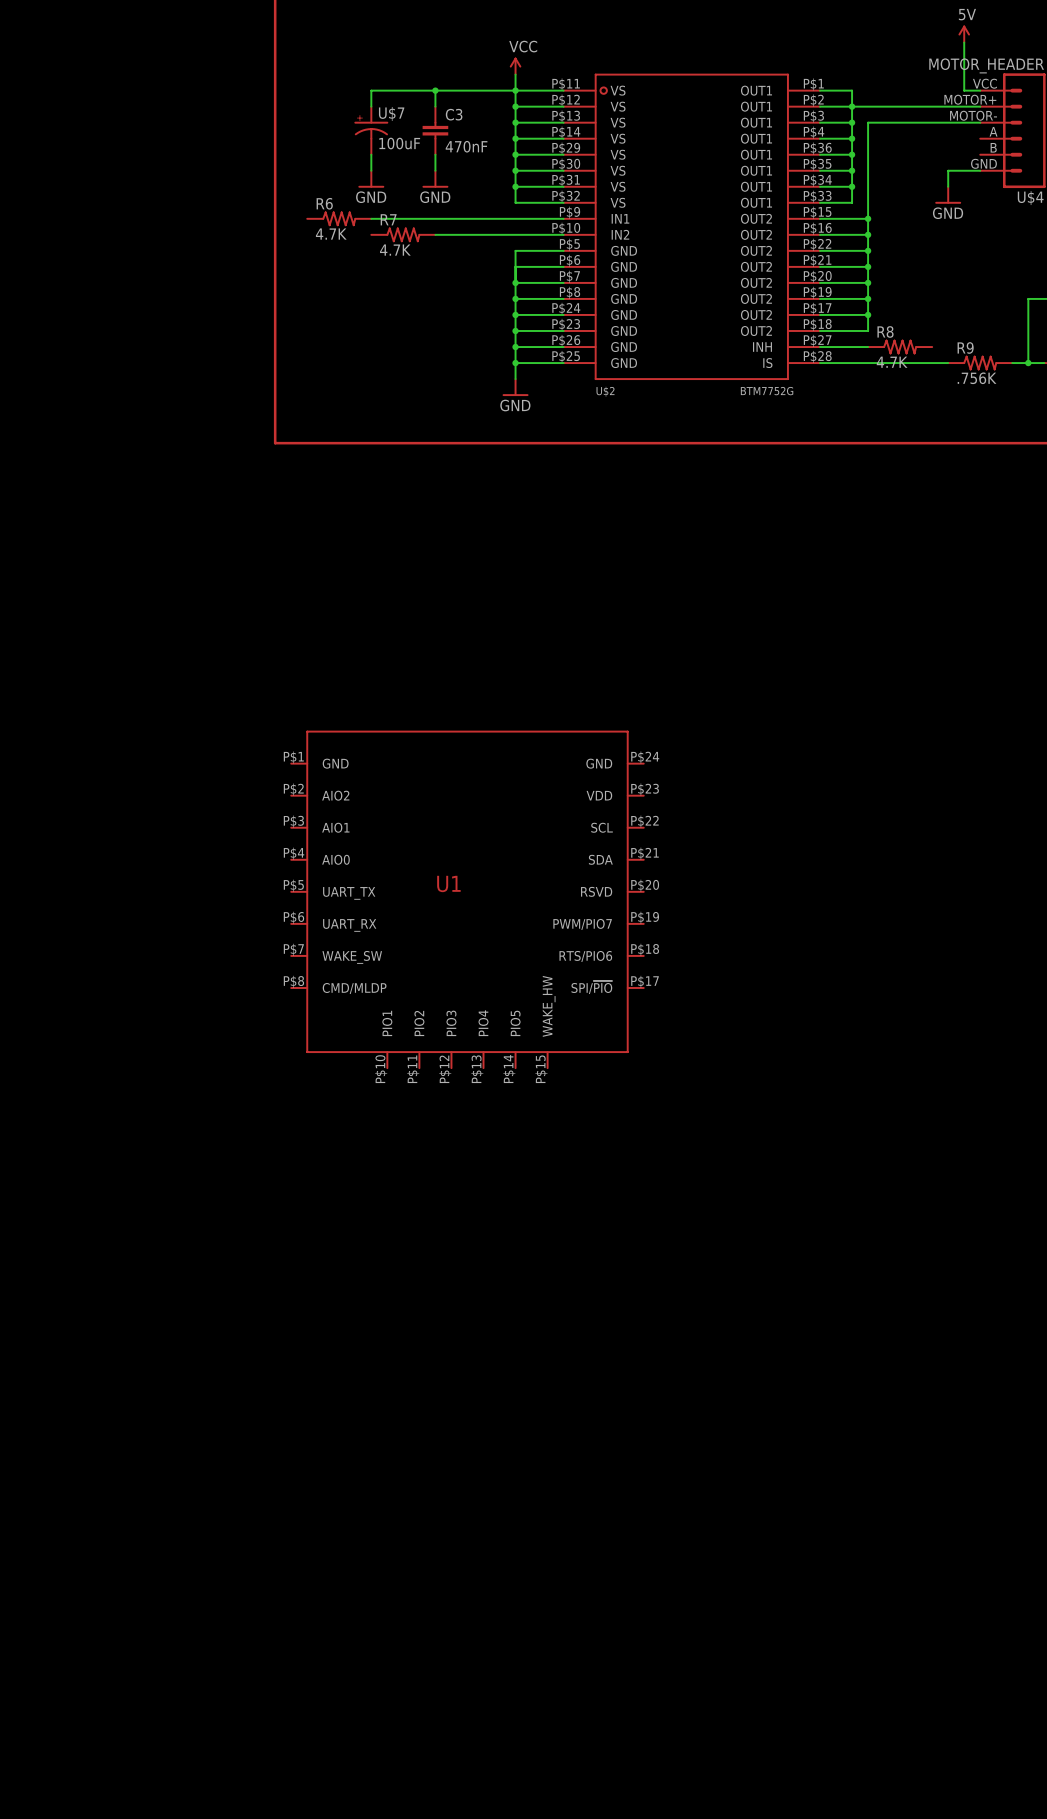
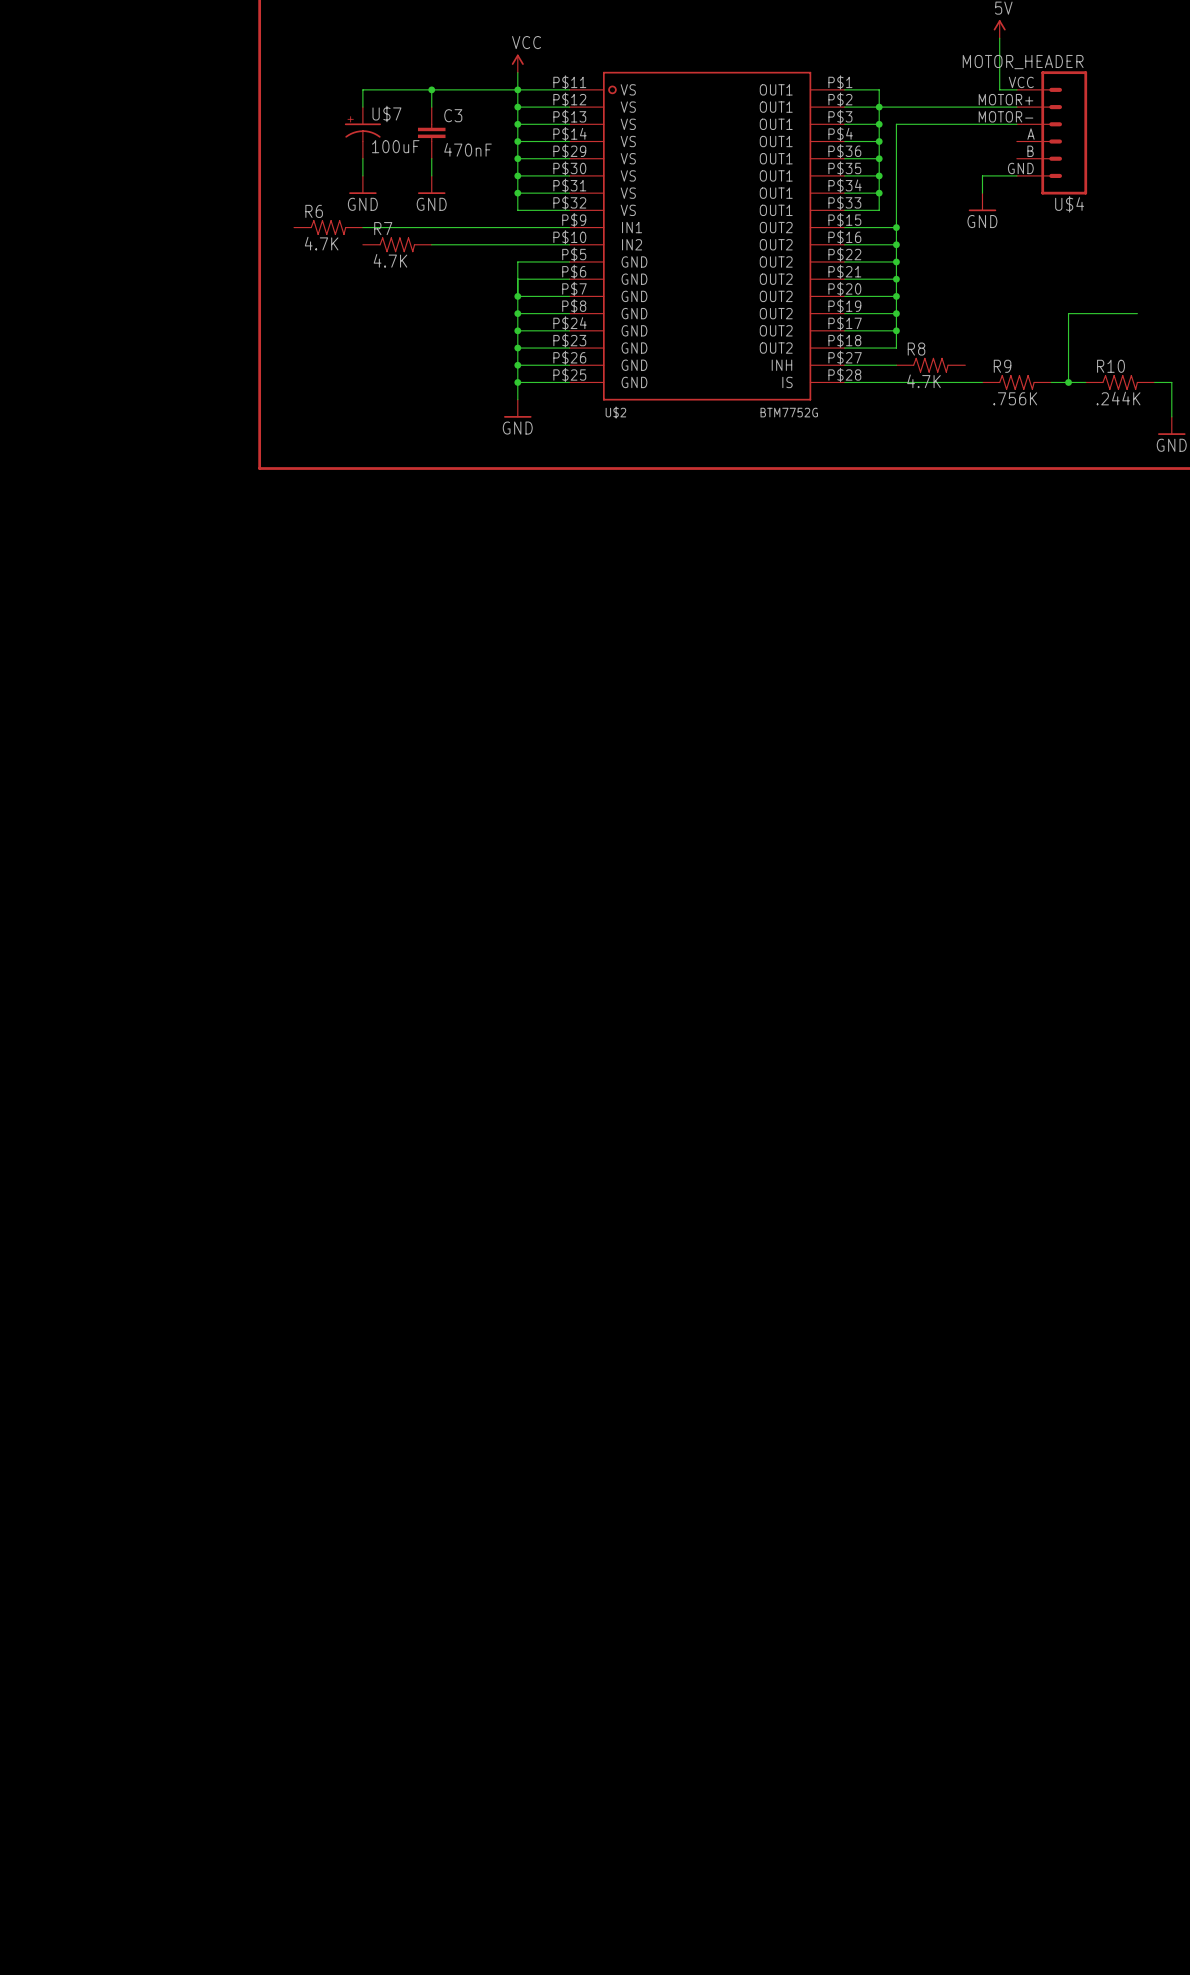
U1: (467, 899) -> none

